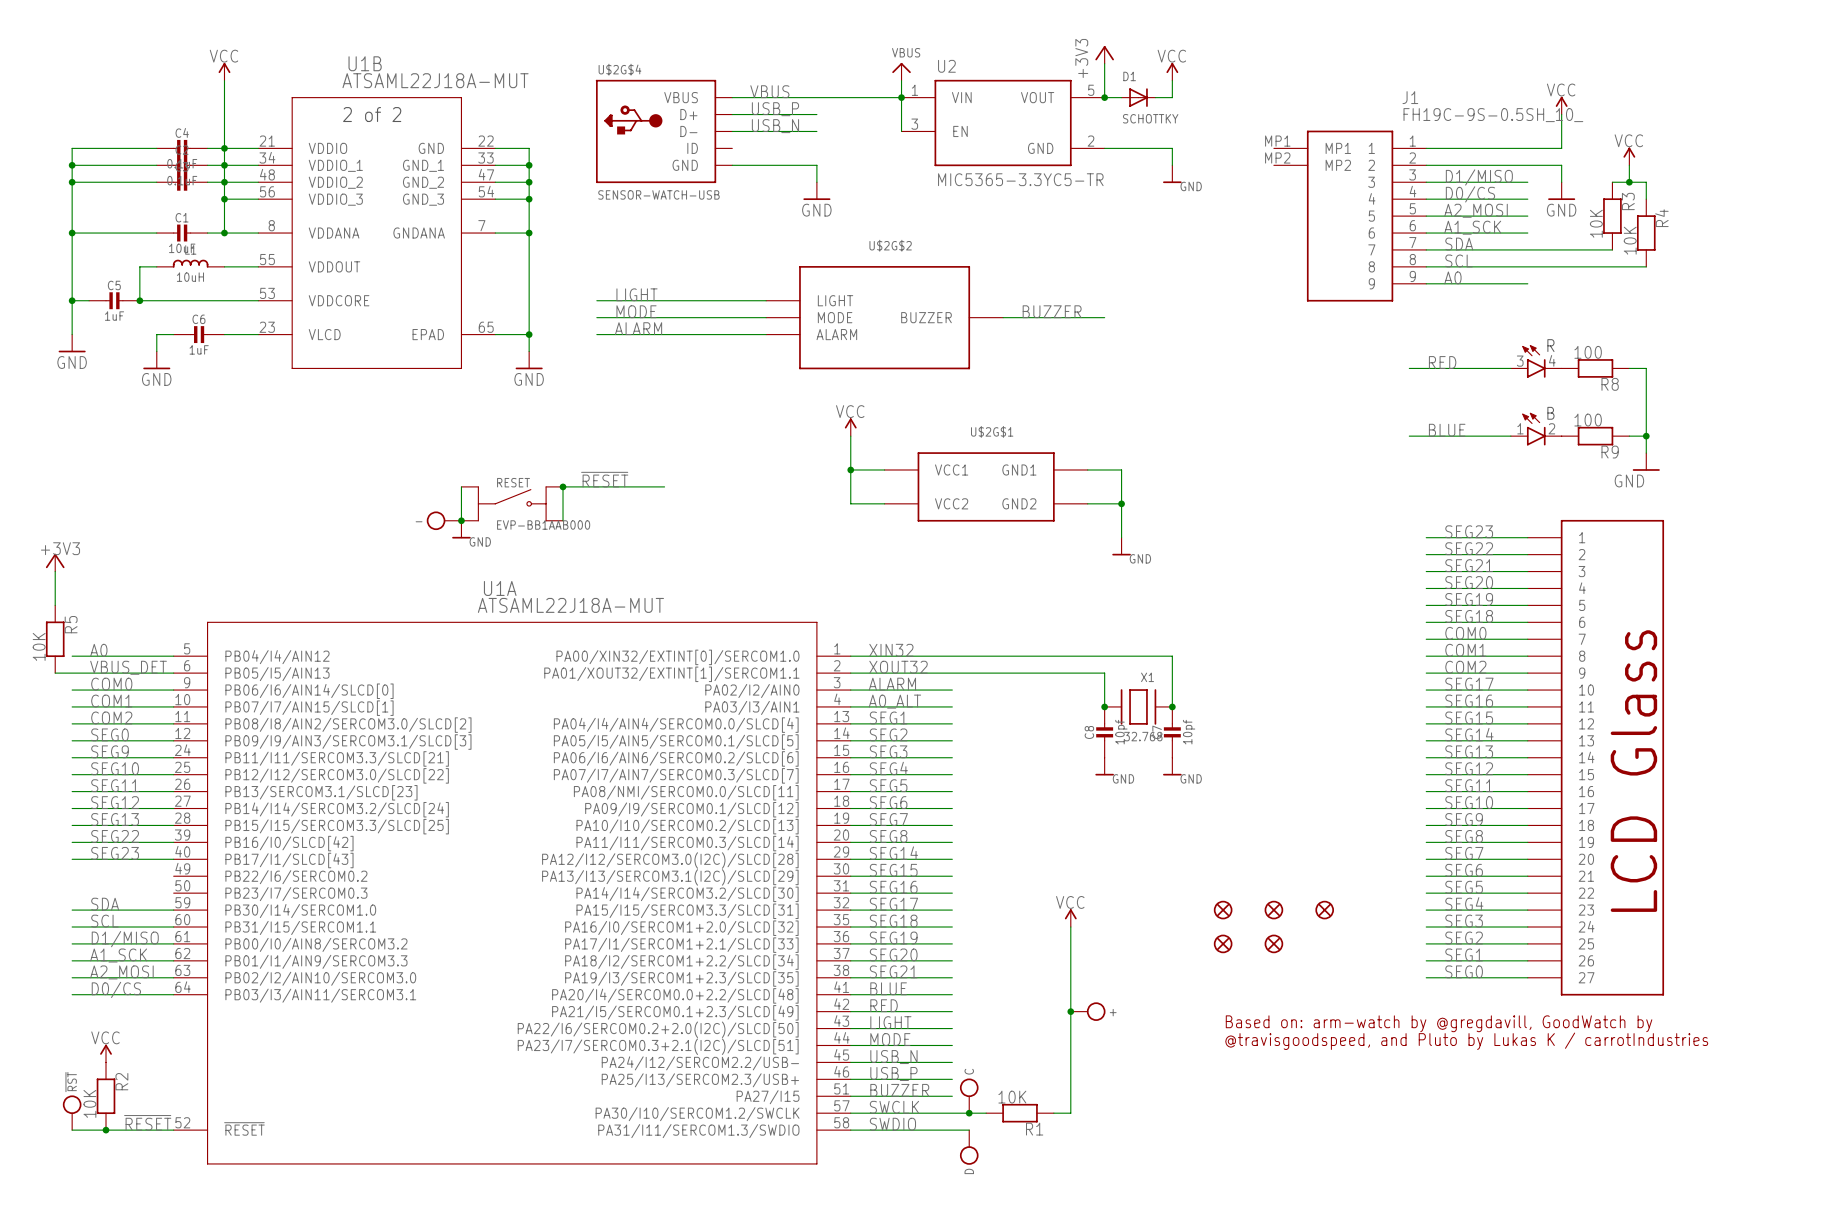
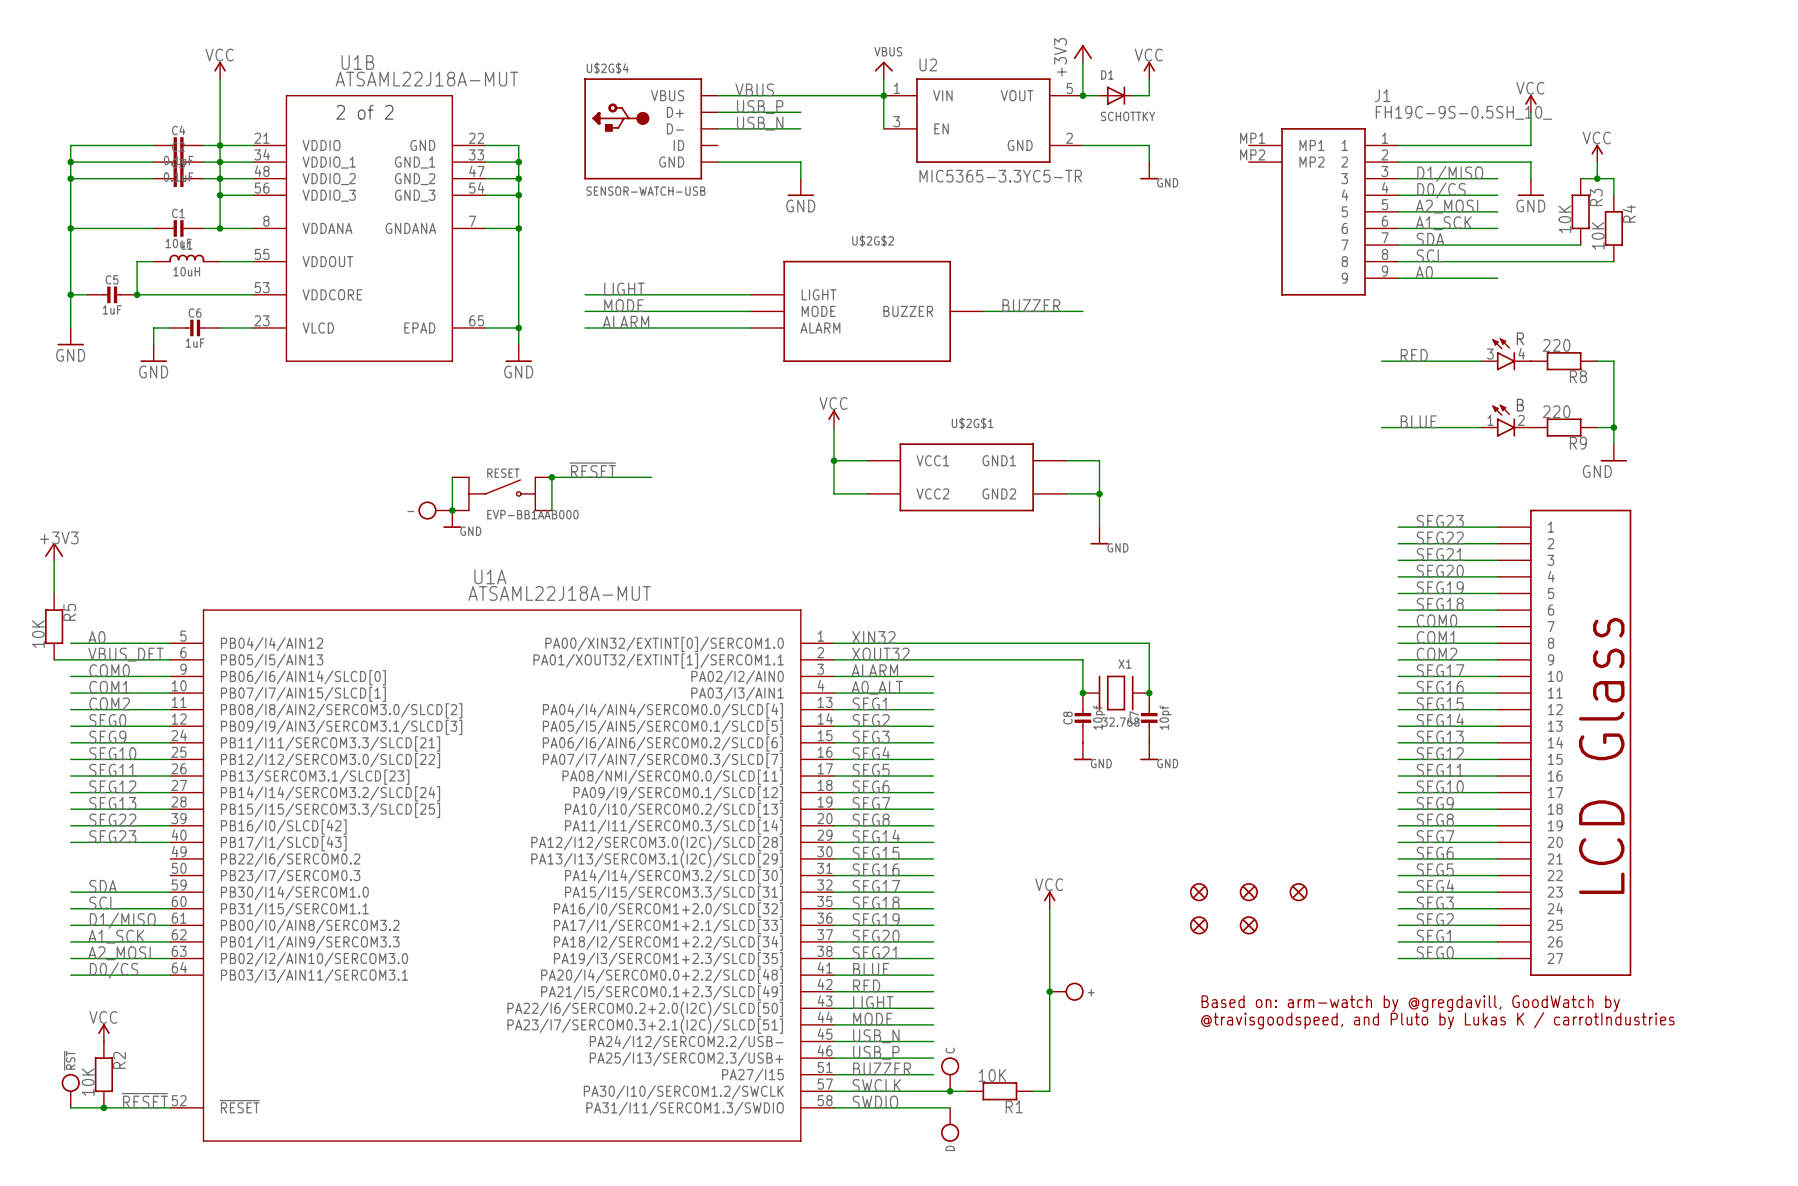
R8 value: 100 (1588, 352) -> 220 (1556, 345)
R9 value: 100 (1588, 420) -> 220 (1556, 411)

